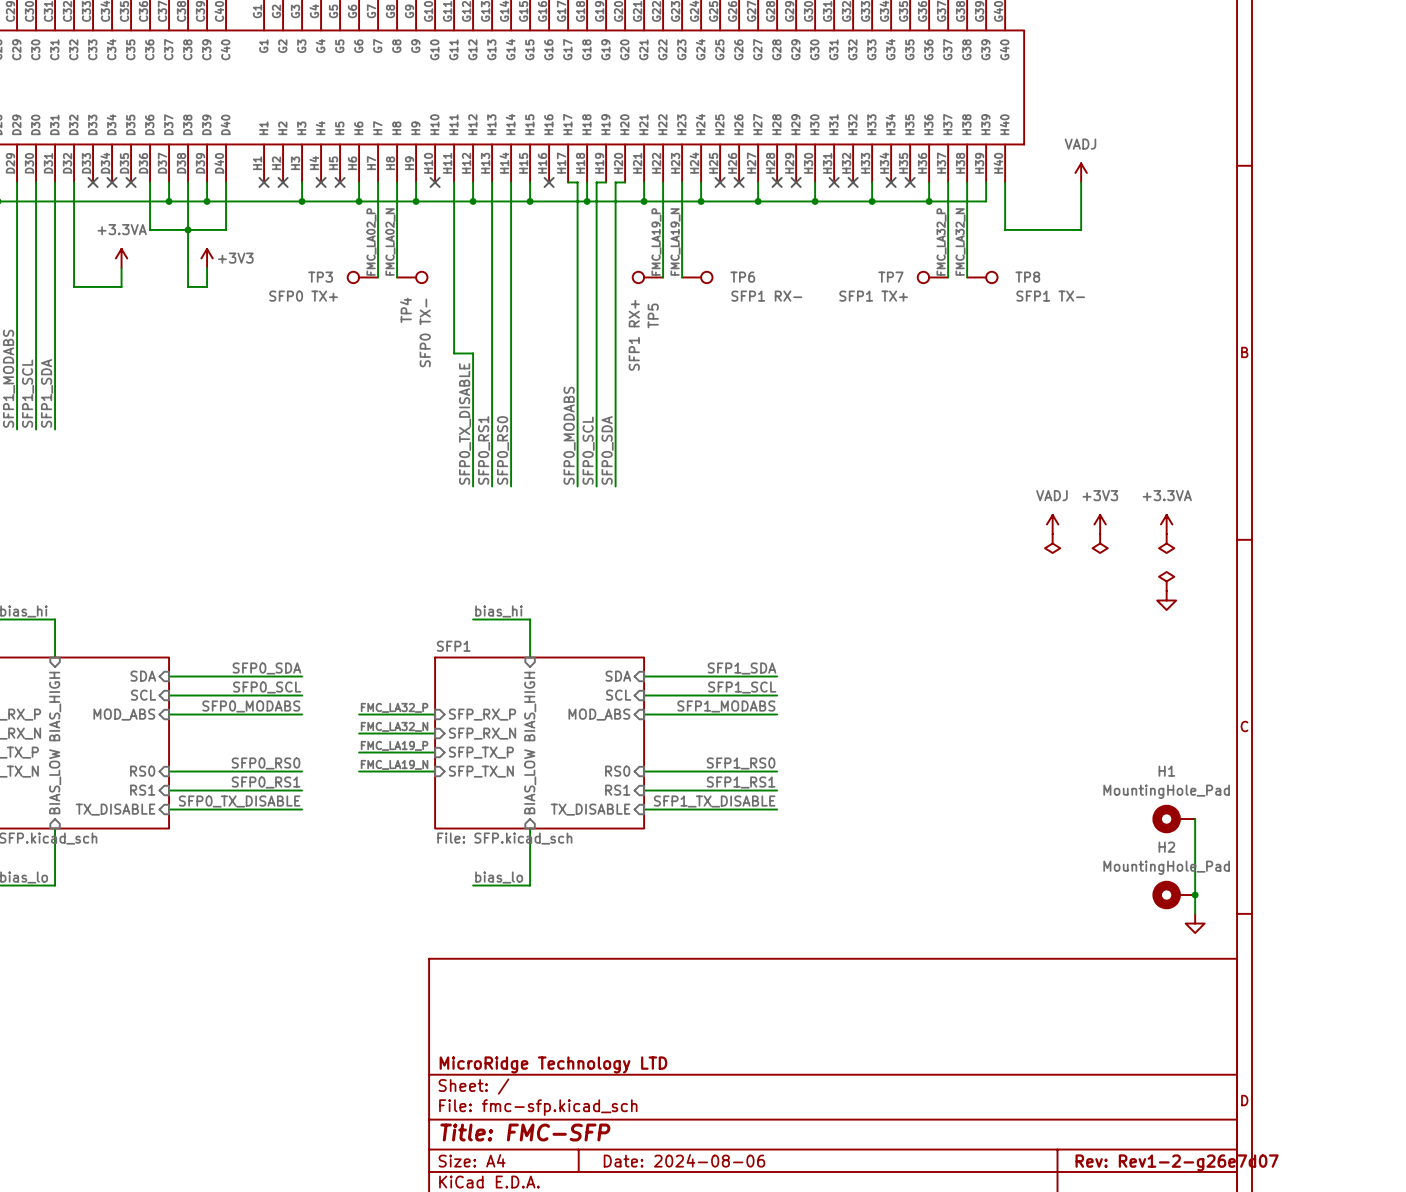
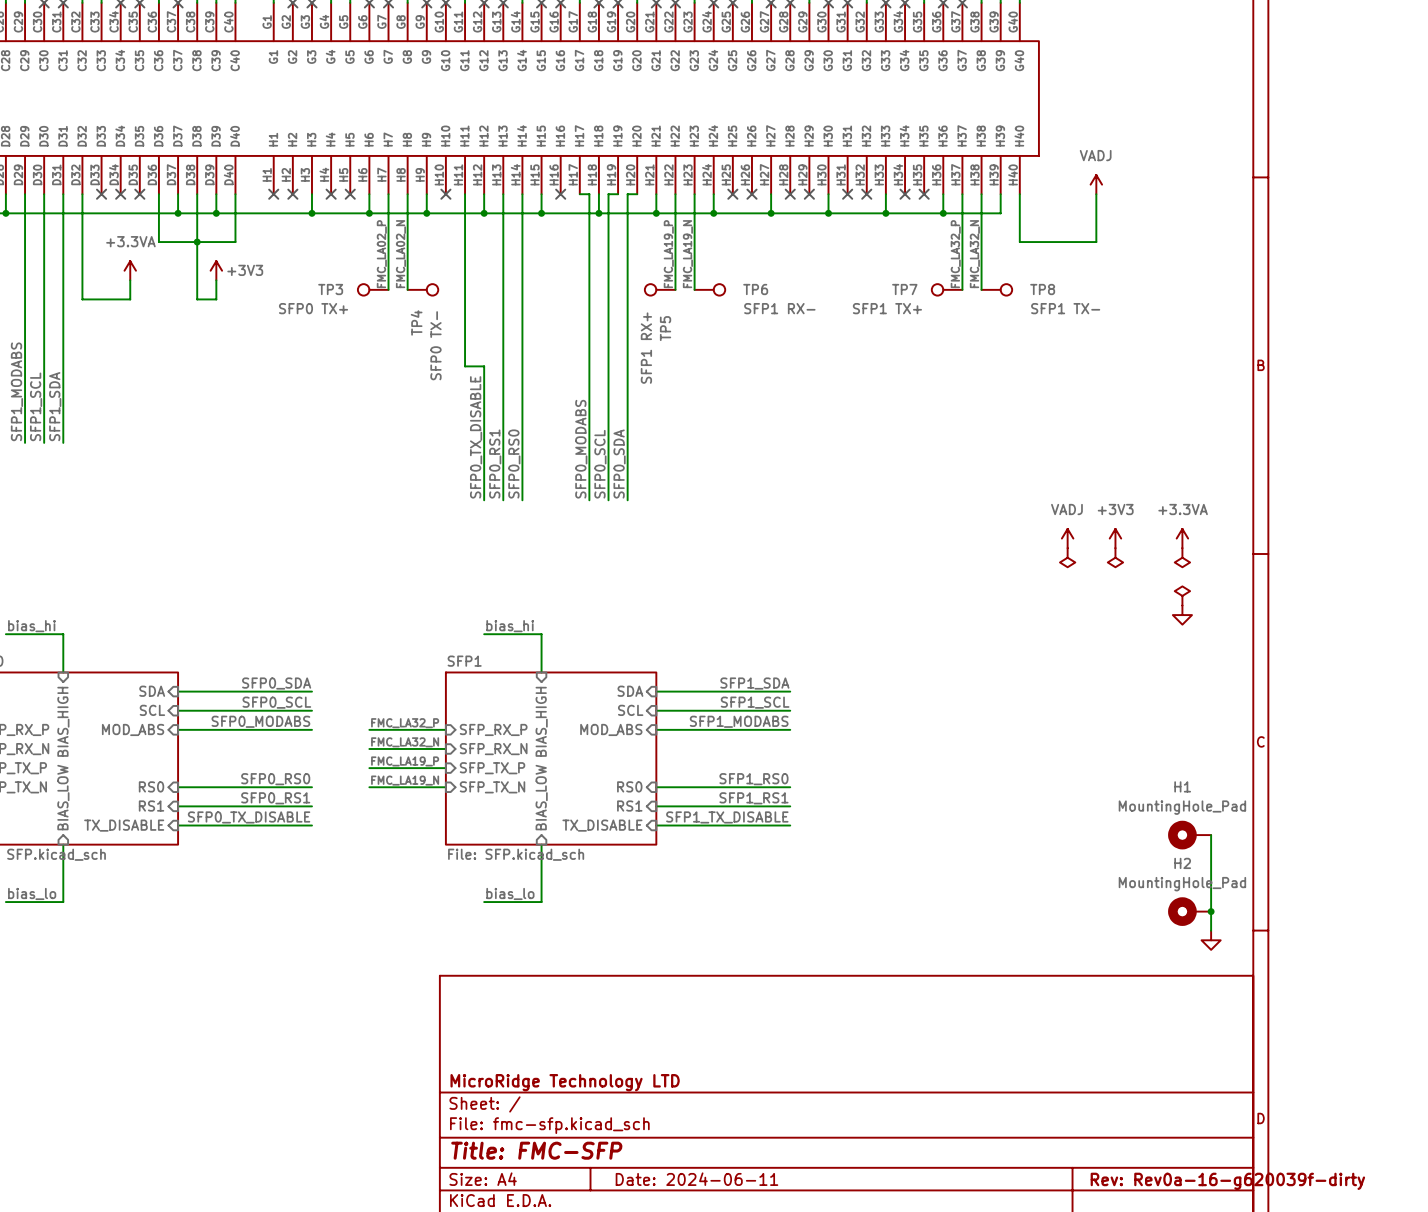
title block: Date: 2024-08-06 (684, 1160) -> Date: 2024-06-11 (696, 1179)
title block: Rev: Rev1-2-g26e7d07 (1177, 1162) -> Rev: Rev0a-16-g620039f-dirty (1227, 1181)

